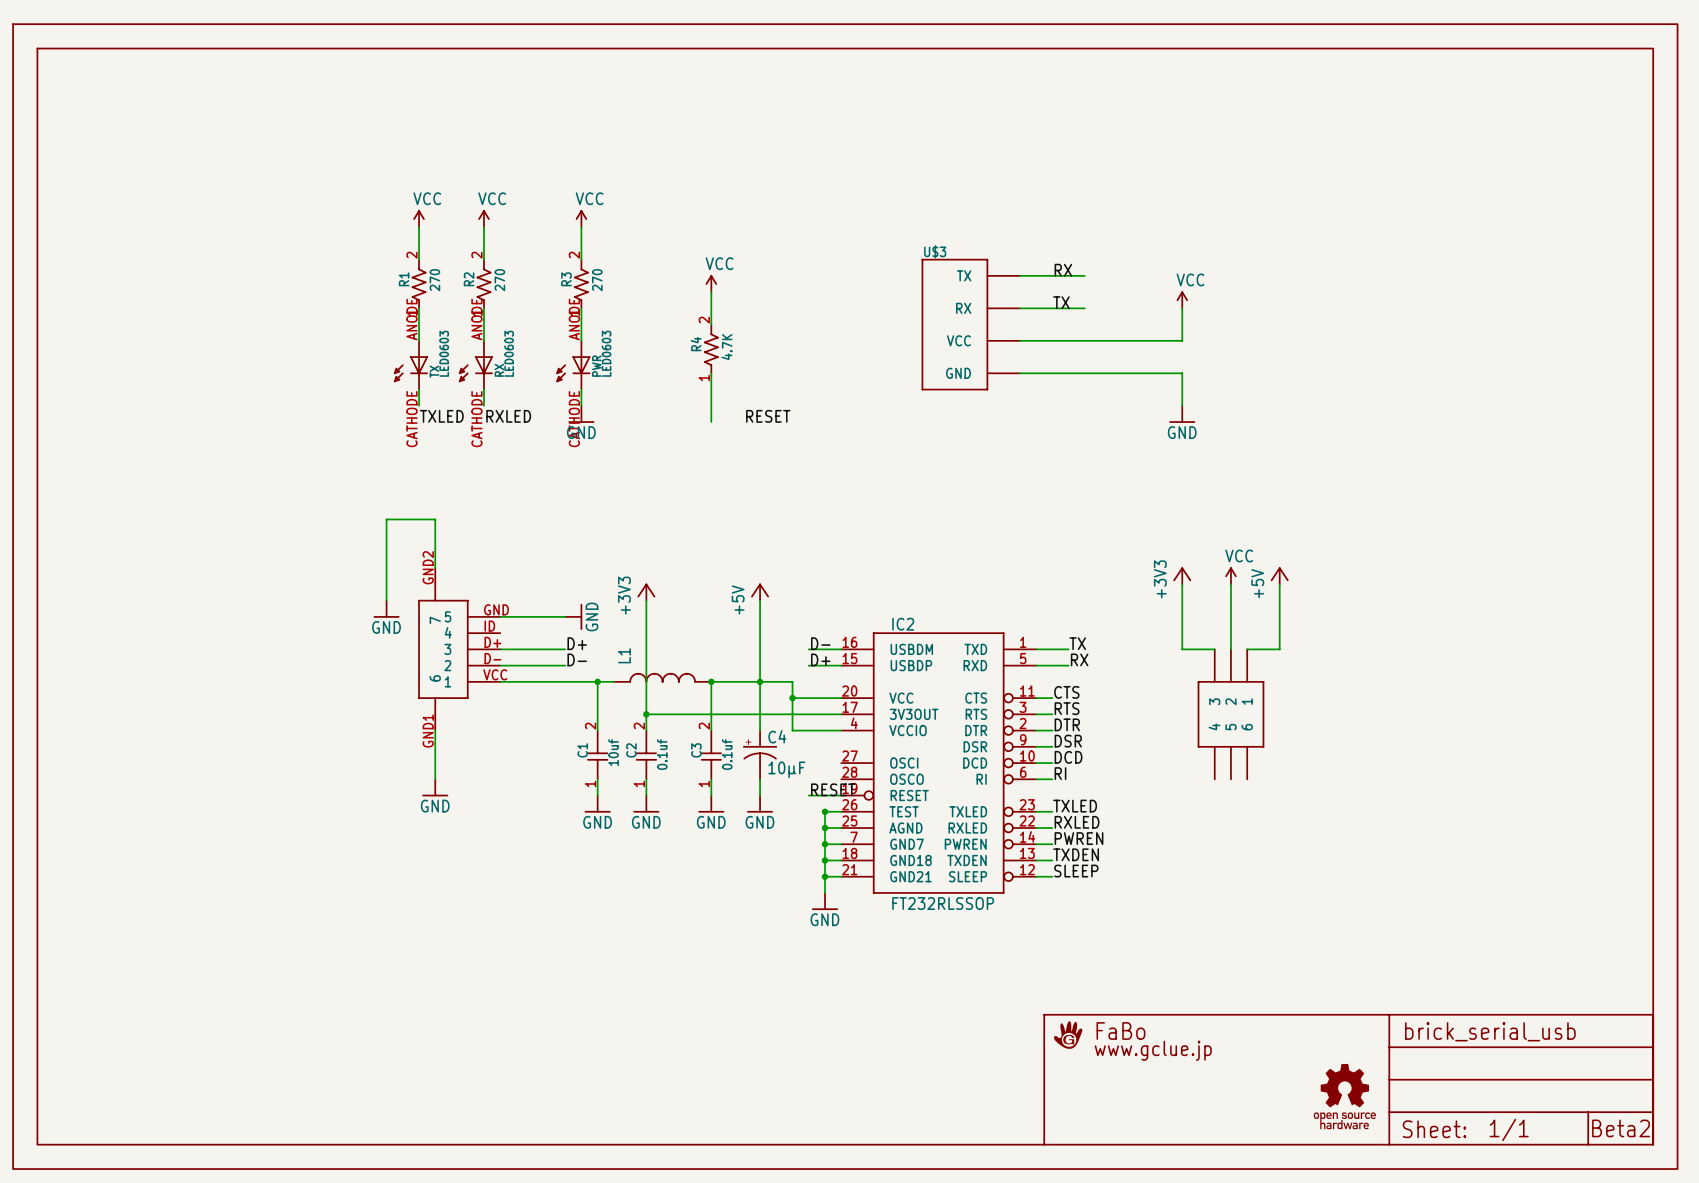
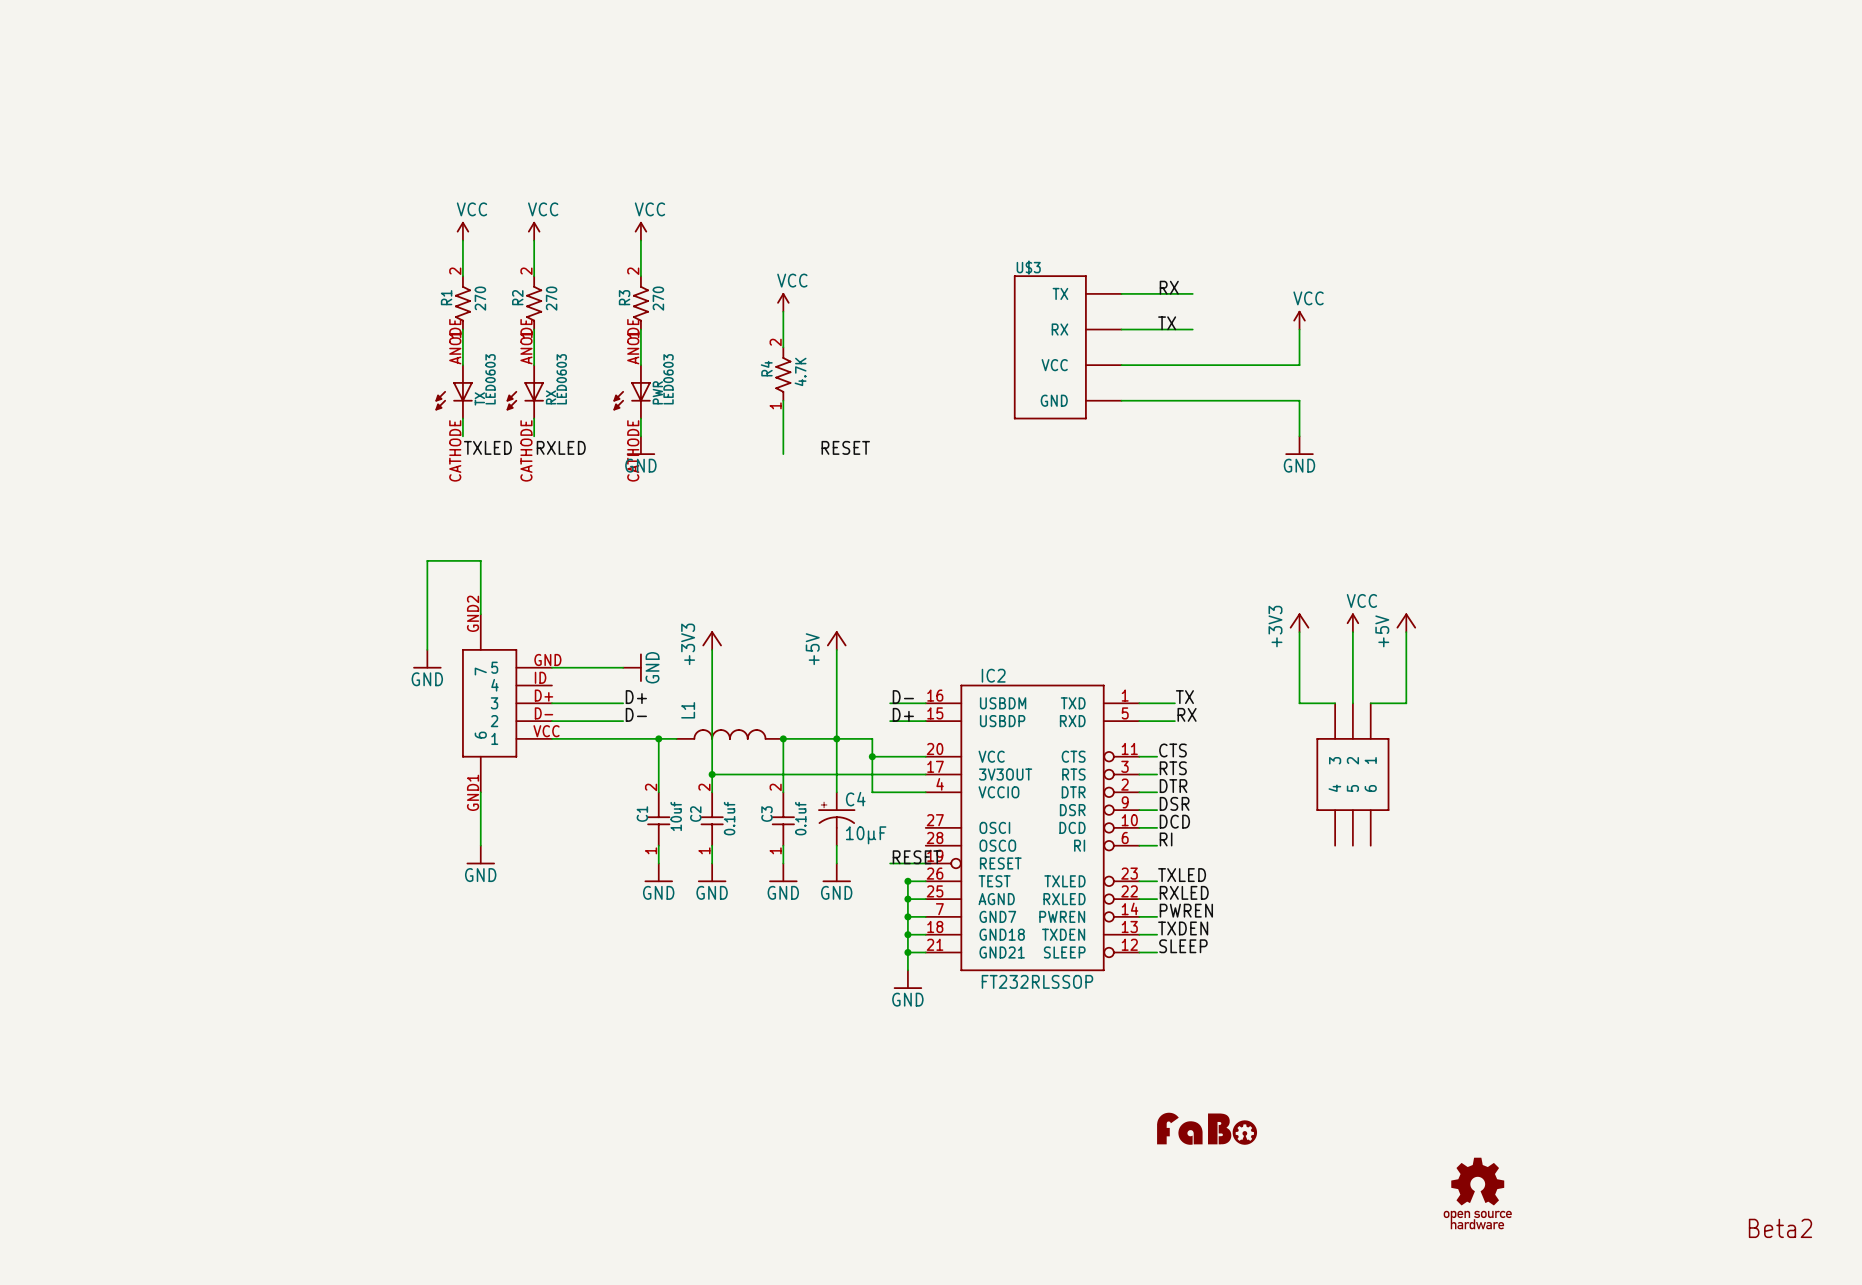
part: (845, 596) -> none
part: none -> (1207, 1128)

